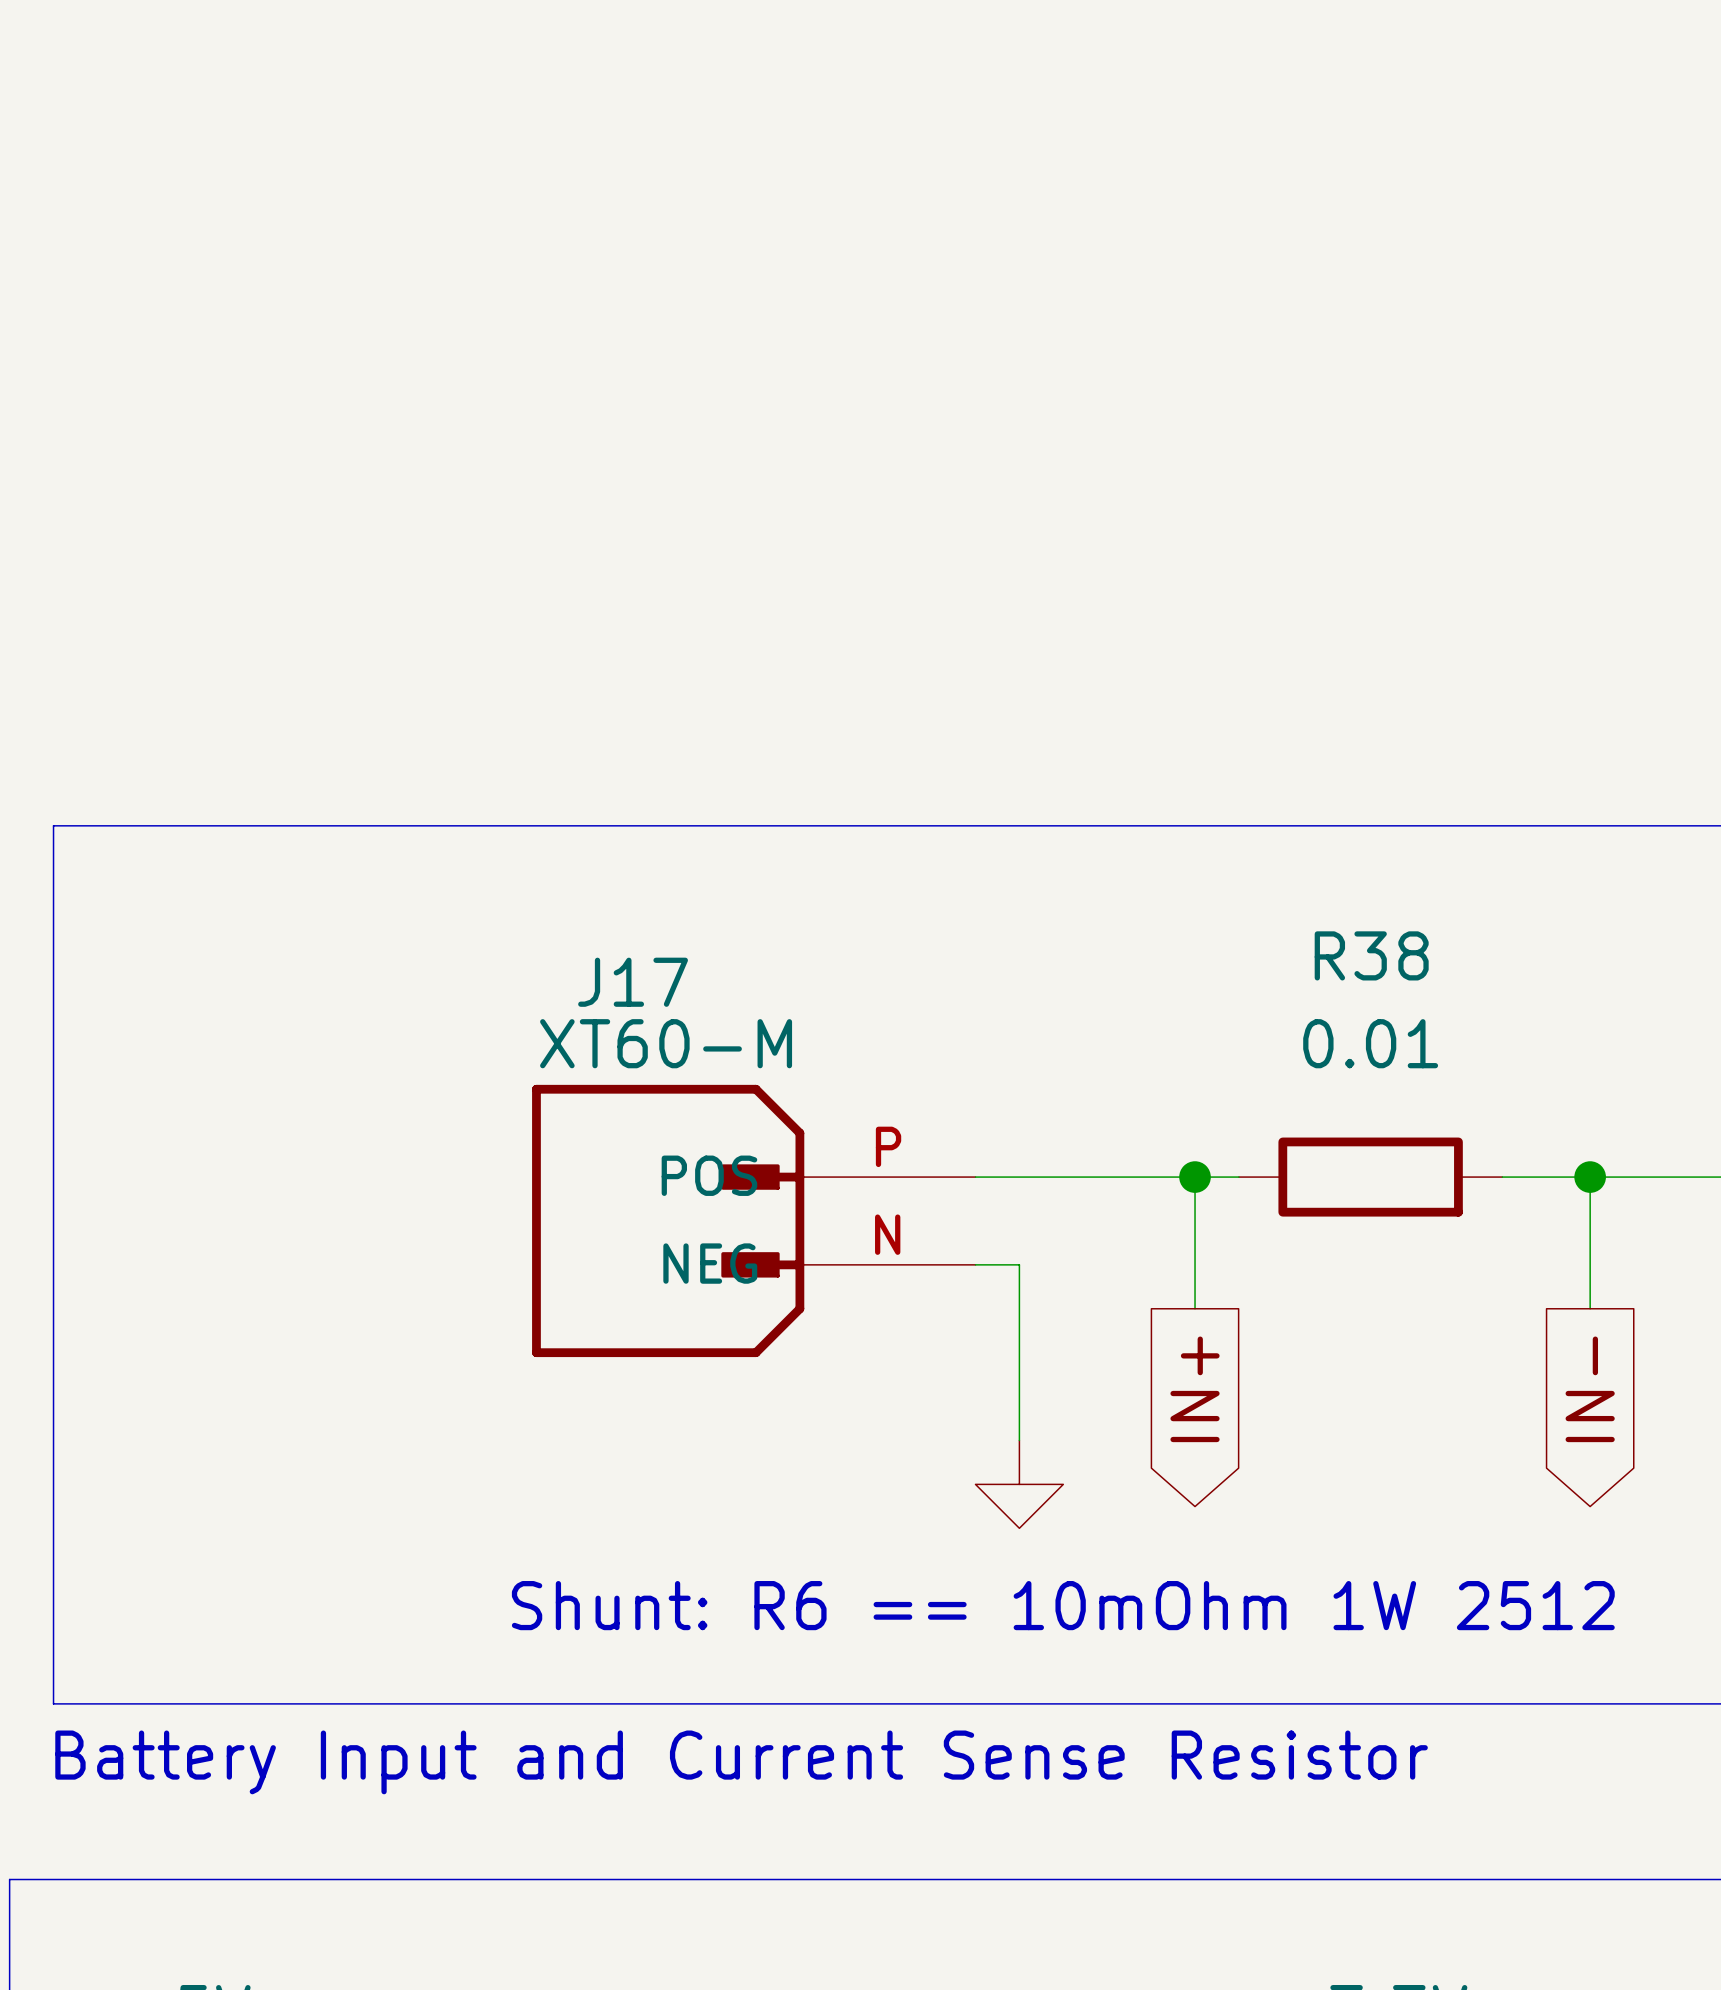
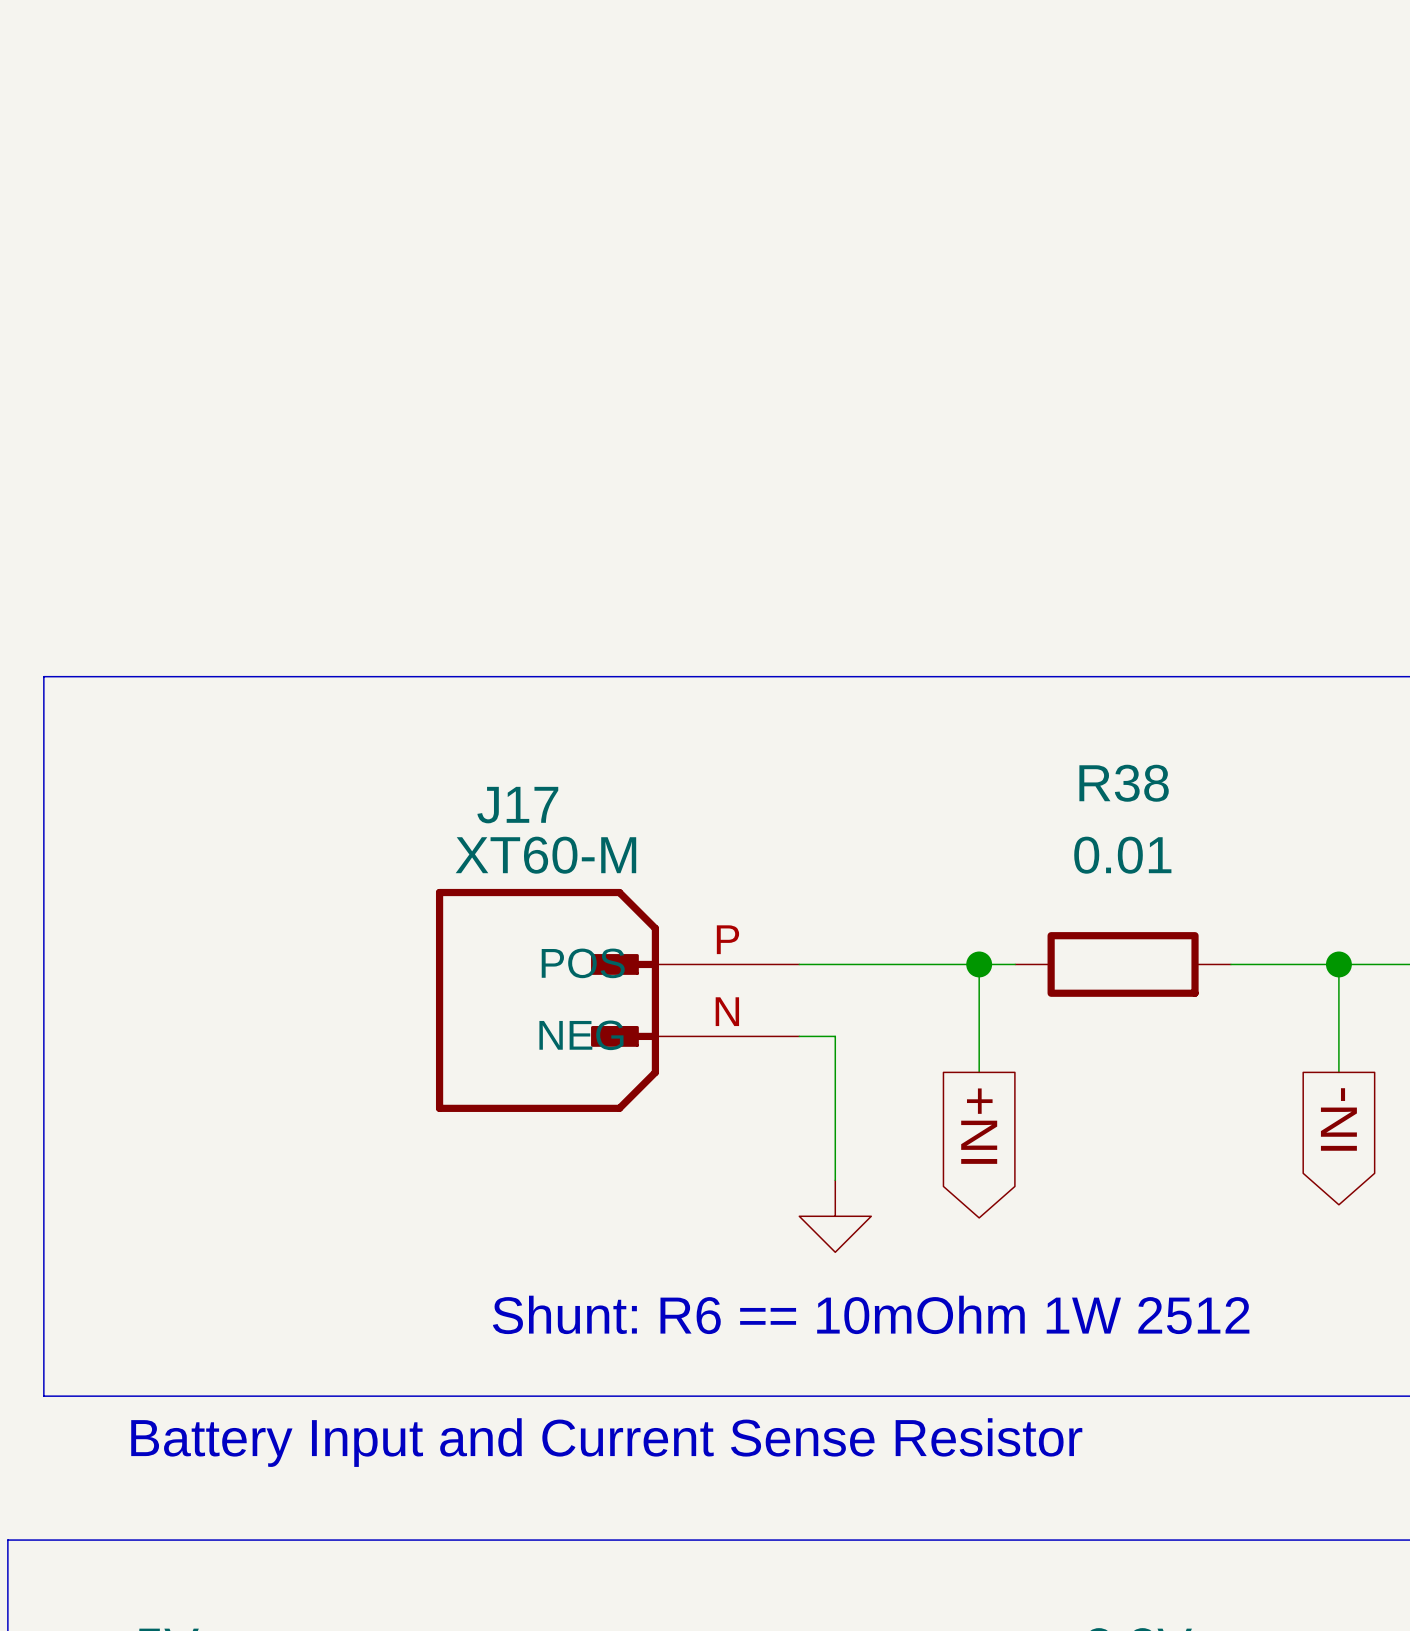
wire: (1590, 1177) (1590, 1308) -> (1338, 964) (1338, 1072)
junction position: (1590, 1177) -> (1338, 964)
global label position: IN- (1590, 1389) -> IN- (1338, 1119)

